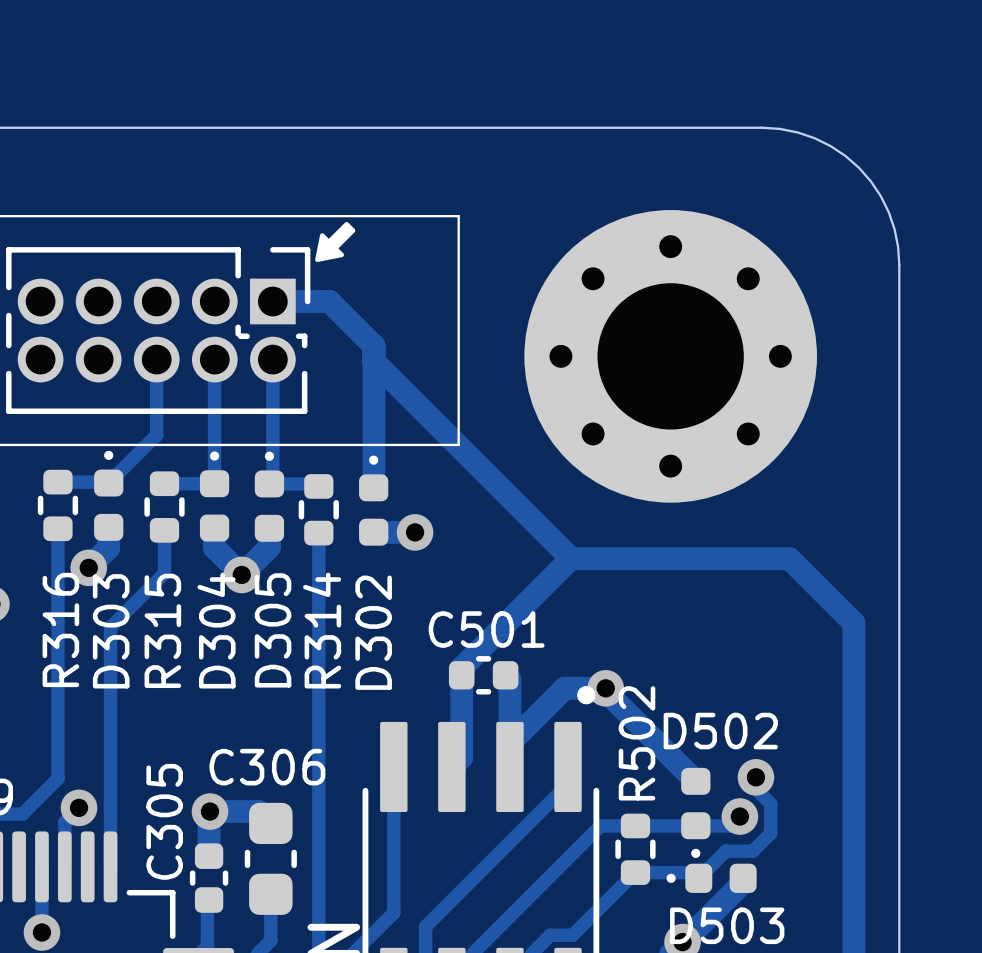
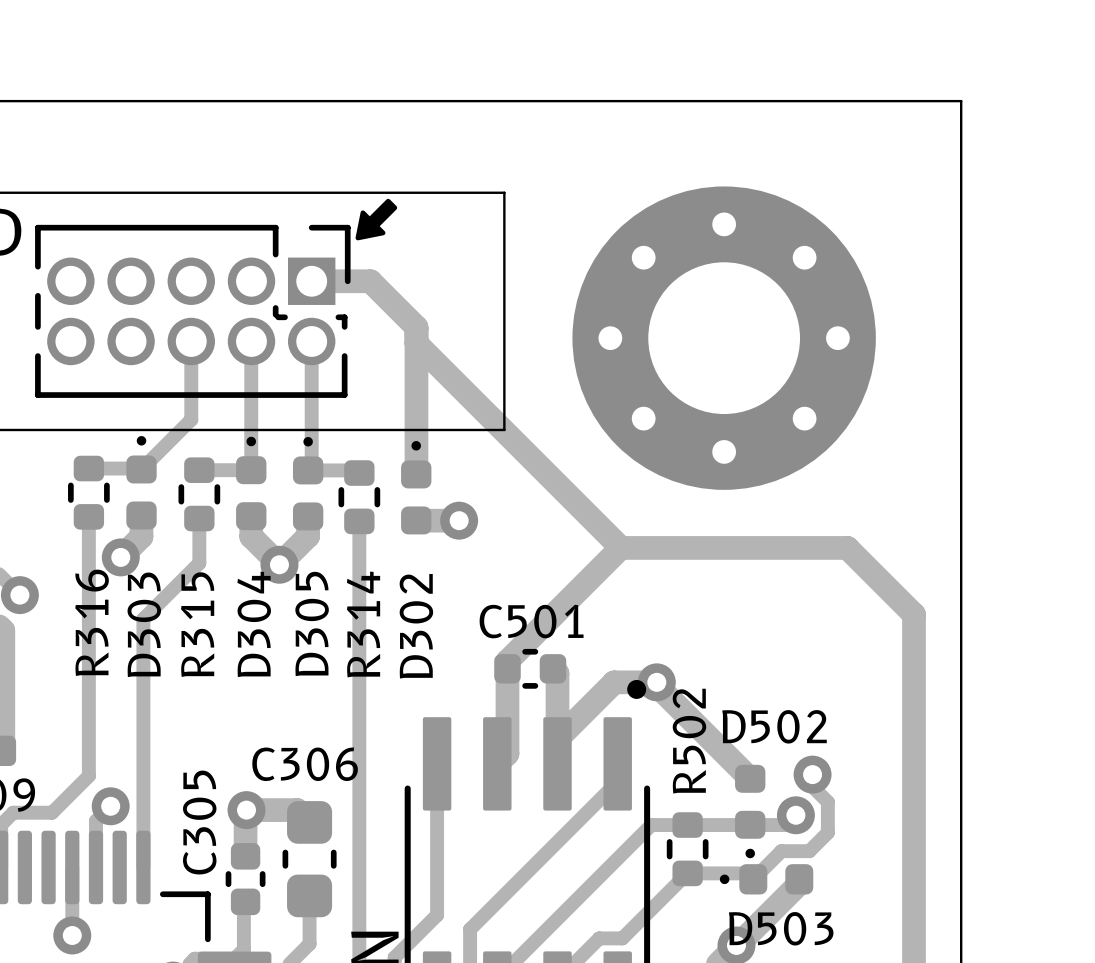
board edge: (762, 127) (780, 128) (814, 138) (830, 146) (859, 167) (880, 196) (888, 212) (894, 229) (899, 264) -> (818, 101) (961, 101) (961, 243)

